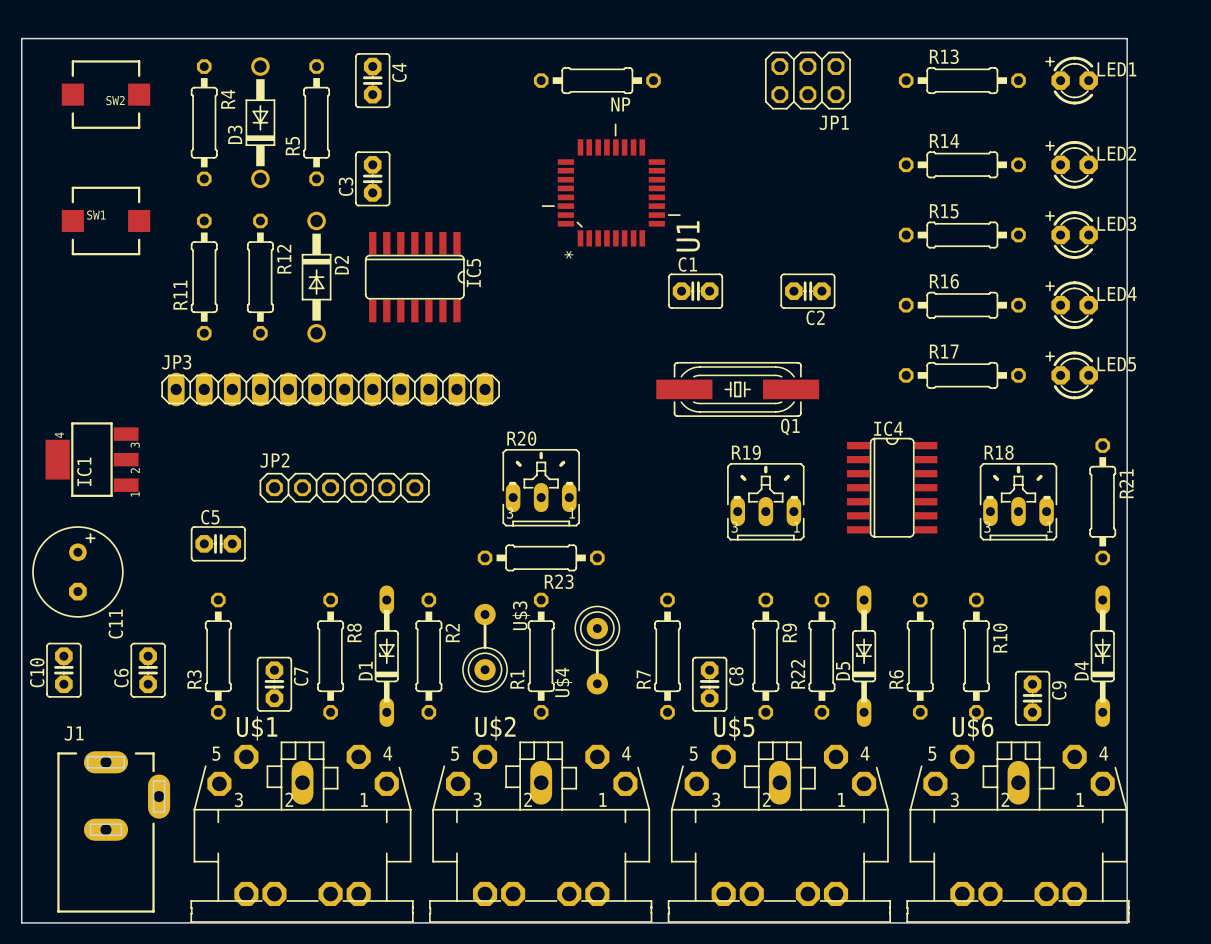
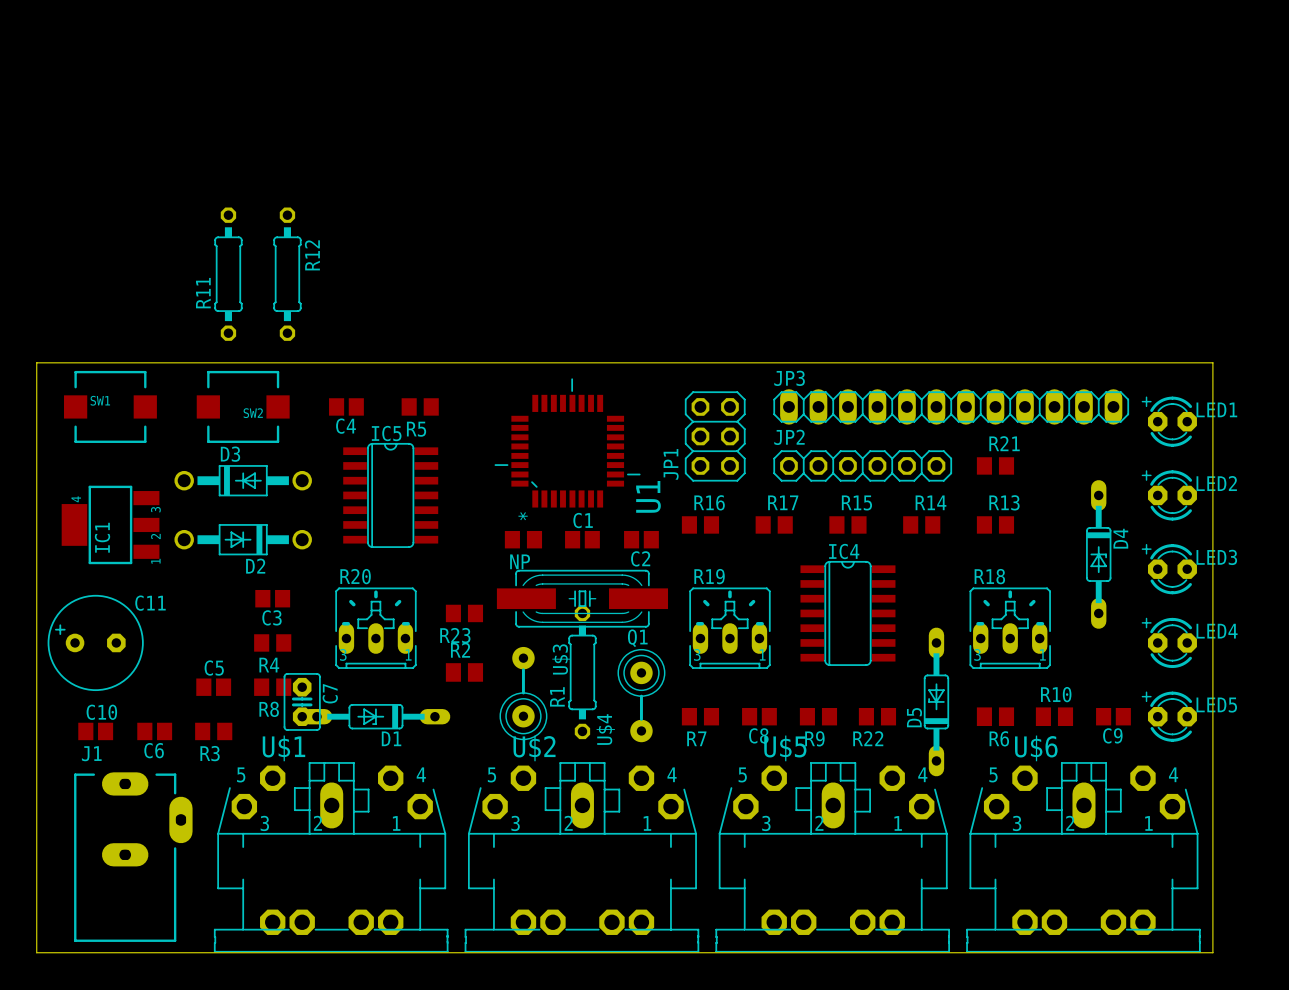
C4 footprint: [355, 53, 391, 109] -> [329, 398, 364, 416]
R13 name position: R13 (944, 56) -> R13 (1004, 502)
R4 footprint: [190, 59, 218, 187] -> [254, 634, 292, 652]
R5 footprint: [303, 59, 331, 187] -> [401, 398, 439, 416]
R13 footprint: [898, 67, 1026, 95] -> [976, 516, 1015, 534]
C4 name position: C4 (399, 72) -> C4 (346, 426)
NP: (597, 80) -> none
JP1 rotation: 0° (807, 80) -> 90° clockwise (715, 436)
JP1 position: (807, 80) -> (715, 436)
LED1 position: (1071, 80) -> (1169, 421)
SW2 position: (105, 94) -> (243, 406)
R4 name position: R4 (228, 99) -> R4 (269, 665)
D3 rotation: 0° (260, 122) -> 90° clockwise (243, 480)
D3 position: (260, 122) -> (243, 480)
R14 name position: R14 (944, 140) -> R14 (930, 502)
C3 footprint: [355, 151, 391, 207] -> [255, 589, 291, 608]
R14 footprint: [898, 151, 1026, 179] -> [903, 516, 941, 534]
LED2 position: (1071, 164) -> (1169, 495)
U1 position: (611, 185) -> (567, 442)
C3 name position: C3 (346, 186) -> C3 (272, 617)
R15 name position: R15 (944, 211) -> R15 (856, 502)
SW1 position: (105, 220) -> (110, 406)
R15 footprint: [898, 221, 1026, 249] -> [829, 516, 867, 534]
LED3 position: (1071, 234) -> (1169, 569)
C1 footprint: [668, 273, 724, 309] -> [565, 530, 600, 549]
C2 footprint: [780, 273, 836, 309] -> [624, 530, 659, 549]
D2 rotation: 0° (316, 277) -> 90° clockwise (243, 539)
D2 position: (316, 277) -> (243, 539)
IC5 rotation: 0° (414, 277) -> 90° counterclockwise (390, 495)
IC5 position: (414, 277) -> (390, 495)
R16 name position: R16 (944, 281) -> R16 (709, 502)
R16 footprint: [898, 291, 1026, 319] -> [681, 516, 720, 534]
LED4 position: (1071, 305) -> (1169, 642)
R17 name position: R17 (944, 351) -> R17 (783, 502)
board edge: (21, 361) (21, 38) (1127, 38) (1127, 922) -> (36, 362) (1212, 362) (1212, 952) (1198, 952)
R17 footprint: [898, 361, 1026, 389] -> [755, 516, 793, 534]
LED5 position: (1071, 375) -> (1169, 716)
JP3 position: (330, 389) -> (951, 406)
Q1 position: (737, 389) -> (582, 598)
R21 footprint: [1089, 438, 1117, 566] -> [976, 457, 1015, 475]
IC1 position: (92, 459) -> (110, 524)
JP2 position: (344, 487) -> (862, 465)
R20 position: (541, 487) -> (375, 628)
IC4 position: (892, 487) -> (847, 613)
R19 position: (765, 501) -> (729, 628)
R18 position: (1018, 501) -> (1010, 628)
C5 footprint: [190, 526, 246, 562] -> [196, 678, 232, 696]
NP: none -> (523, 539)
R23 footprint: [477, 544, 605, 572] -> [445, 604, 484, 623]
C11 rotation: 0° (77, 571) -> 90° counterclockwise (95, 642)
C11 position: (77, 571) -> (95, 642)
R23 name position: R23 (559, 581) -> R23 (455, 635)
R3 footprint: [204, 592, 232, 720] -> [195, 722, 233, 741]
R8 footprint: [317, 592, 345, 720] -> [254, 678, 292, 696]
R2 footprint: [415, 592, 443, 720] -> [445, 663, 484, 682]
R7 footprint: [654, 592, 682, 720] -> [681, 707, 720, 726]
R9 footprint: [752, 592, 780, 720] -> [799, 707, 838, 726]
R22 footprint: [808, 592, 836, 720] -> [858, 707, 897, 726]
R6 footprint: [906, 592, 934, 720] -> [976, 707, 1015, 726]
R10 footprint: [962, 592, 990, 720] -> [1035, 707, 1074, 726]
R8 name position: R8 (354, 632) -> R8 (269, 709)
R9 name position: R9 (789, 632) -> R9 (814, 738)
R2 name position: R2 (452, 633) -> R2 (460, 650)
C10 footprint: [46, 642, 82, 698] -> [78, 722, 114, 741]
C6 footprint: [130, 642, 166, 698] -> [137, 722, 173, 741]
U$3 position: (485, 648) -> (523, 693)
U$4 position: (597, 650) -> (641, 695)
D1 rotation: 0° (386, 656) -> 90° counterclockwise (375, 716)
C8 footprint: [691, 656, 728, 712] -> [742, 707, 777, 726]
D5 position: (864, 656) -> (936, 701)
D4 rotation: 0° (1102, 656) -> 180° (1098, 554)
D4 position: (1102, 656) -> (1098, 554)
C9 footprint: [1014, 670, 1051, 726] -> [1096, 707, 1131, 726]
C10 name position: C10 (37, 672) -> C10 (101, 712)
C8 name position: C8 (736, 676) -> C8 (758, 735)
C6 name position: C6 (121, 678) -> C6 (154, 750)
C9 name position: C9 (1059, 690) -> C9 (1112, 735)

